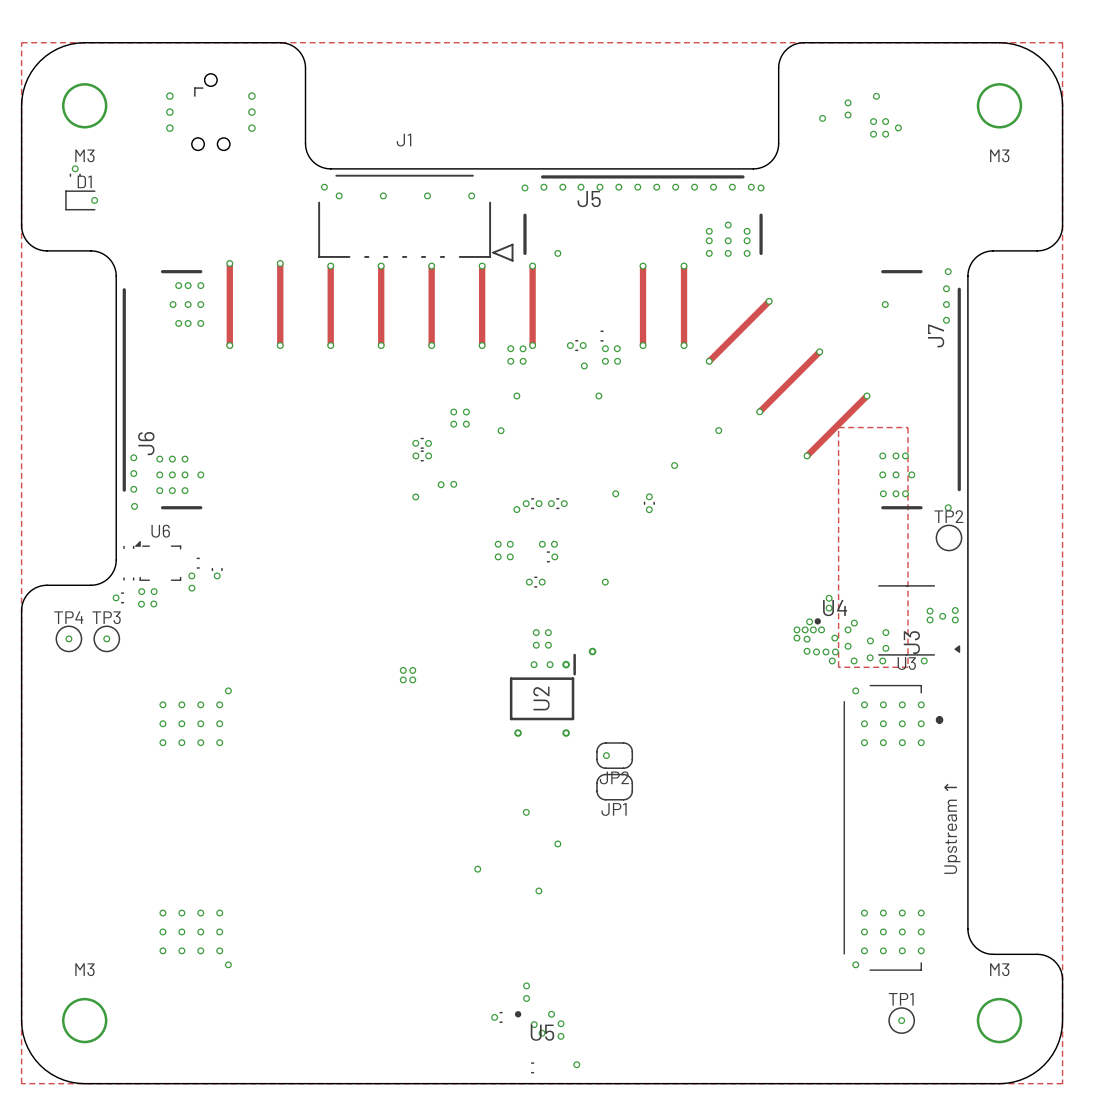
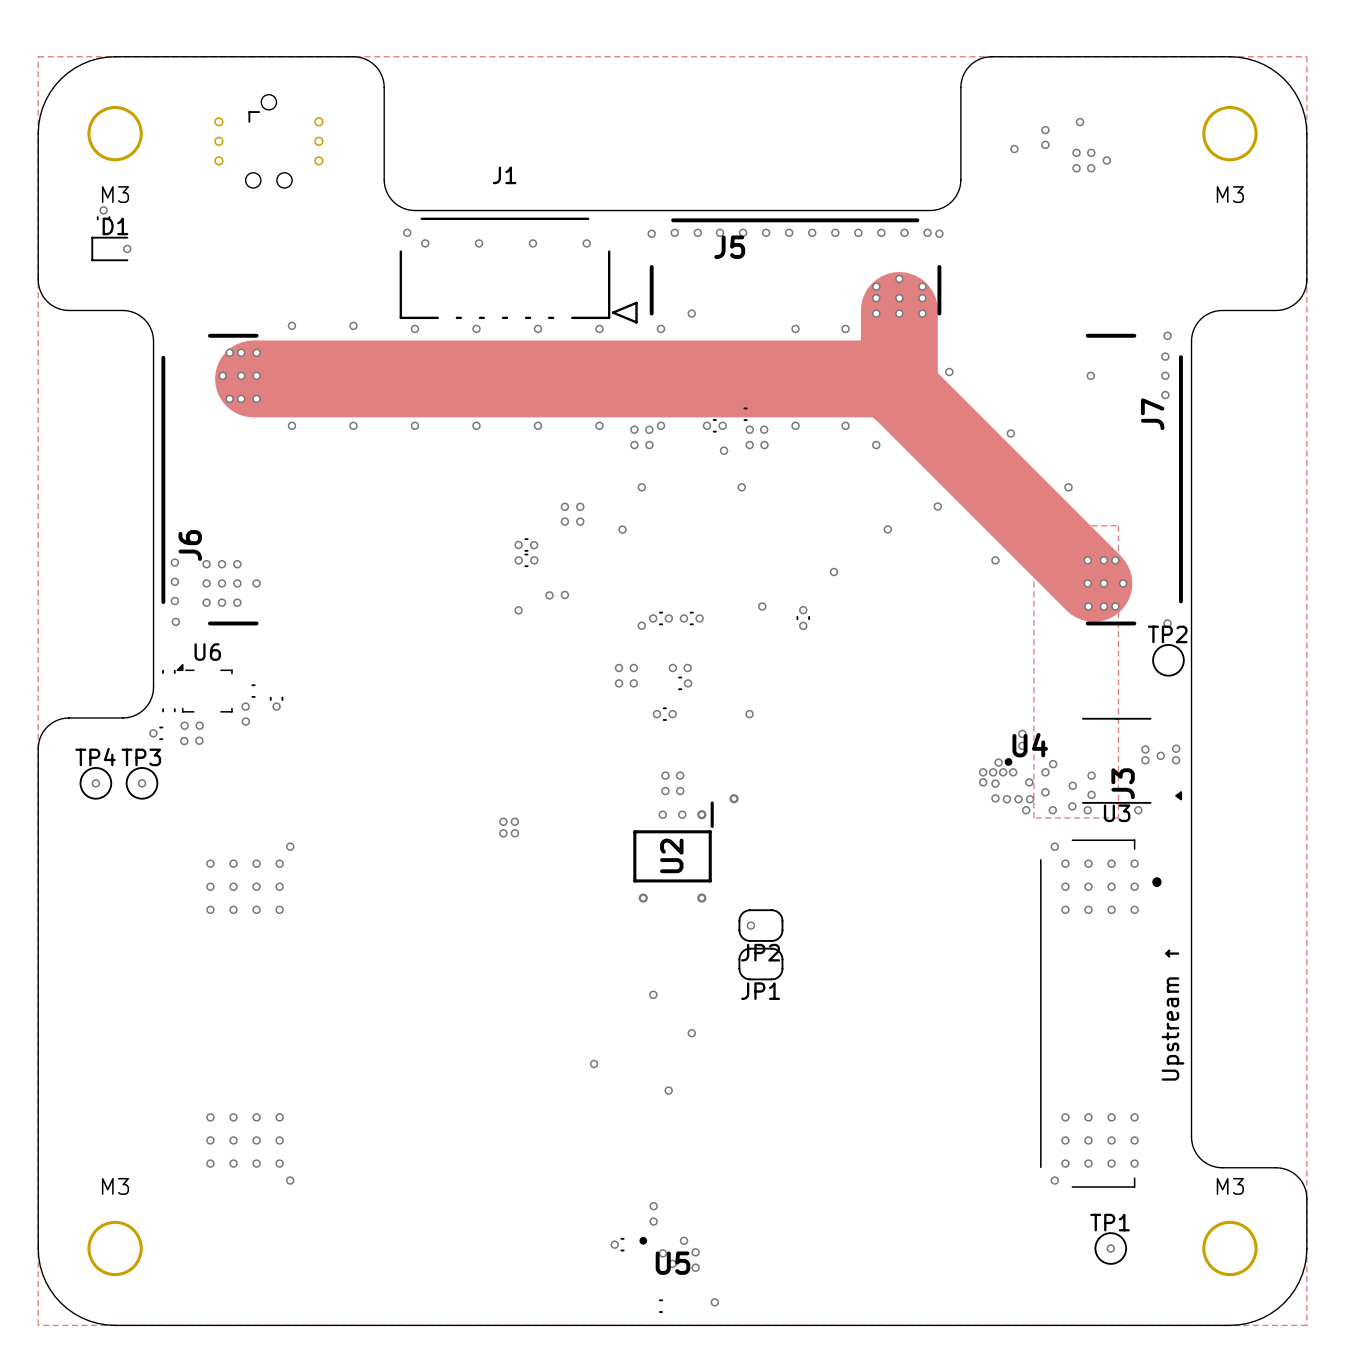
track: none -> (899, 310) (899, 388)
track: (229, 263) (229, 345) -> none
track: (280, 263) (280, 345) -> none
track: (330, 266) (330, 345) -> none
track: (381, 266) (381, 345) -> none
track: (431, 266) (431, 345) -> none
track: (482, 266) (482, 345) -> none
track: (532, 266) (532, 345) -> none
track: (643, 266) (643, 345) -> none
track: (684, 266) (684, 345) -> none
track: (769, 301) (709, 361) -> none
track: none -> (253, 378) (889, 378) (1093, 583)
track: (819, 351) (759, 411) -> none
track: (866, 396) (807, 455) -> none

